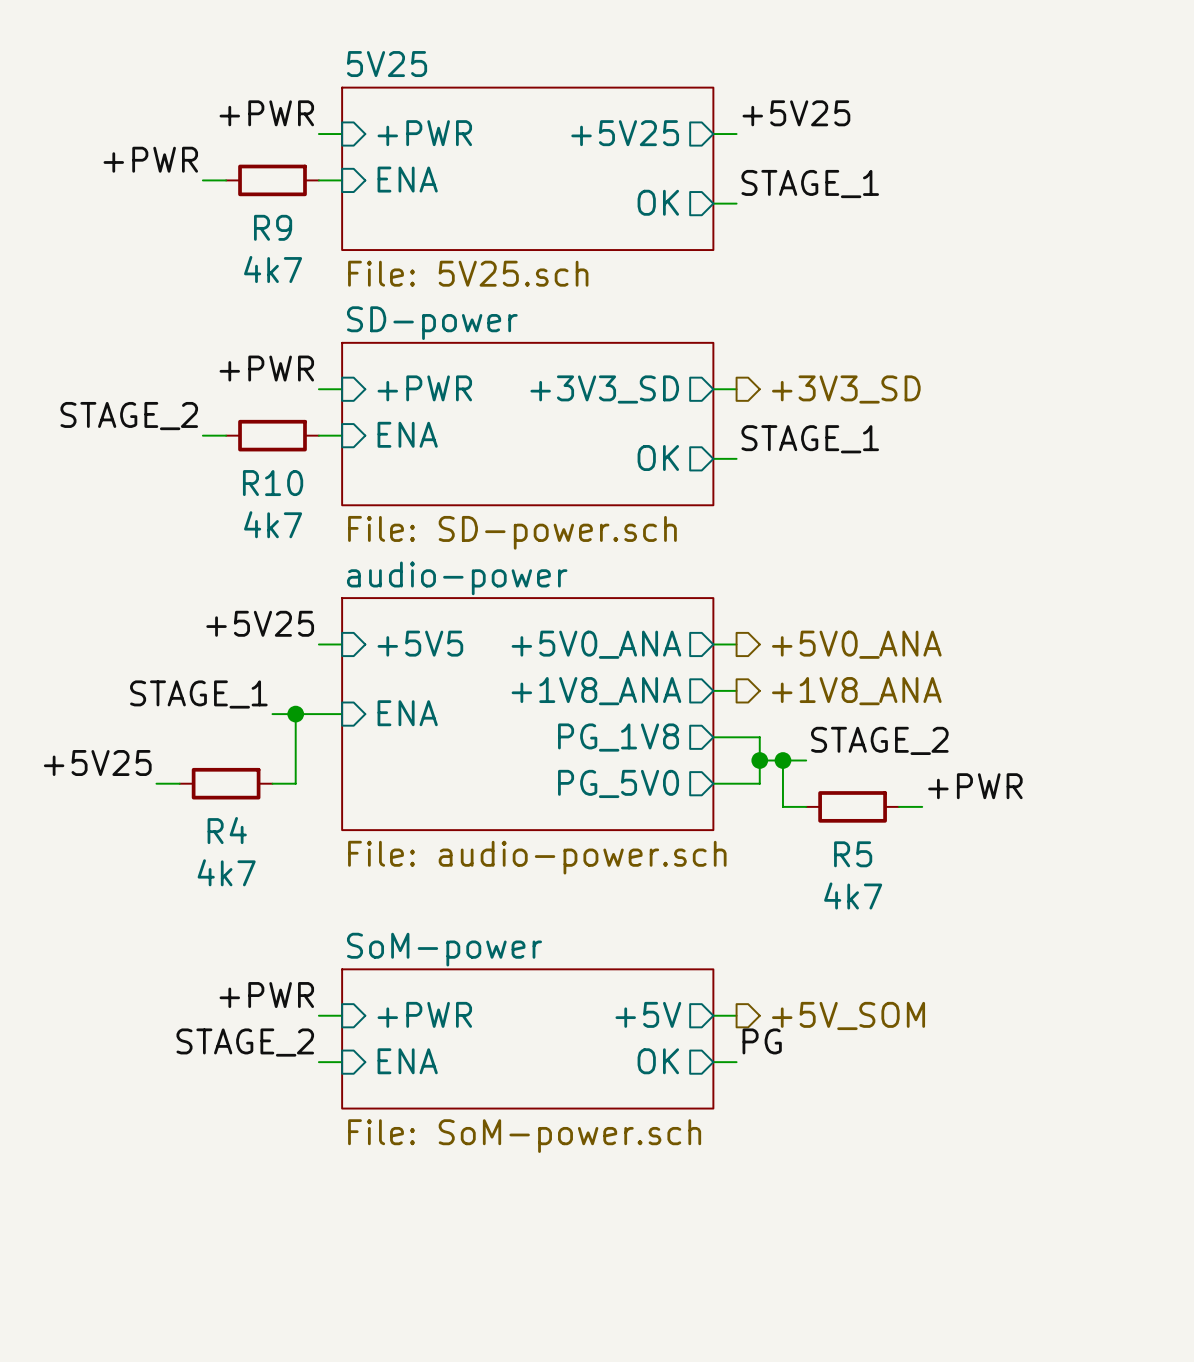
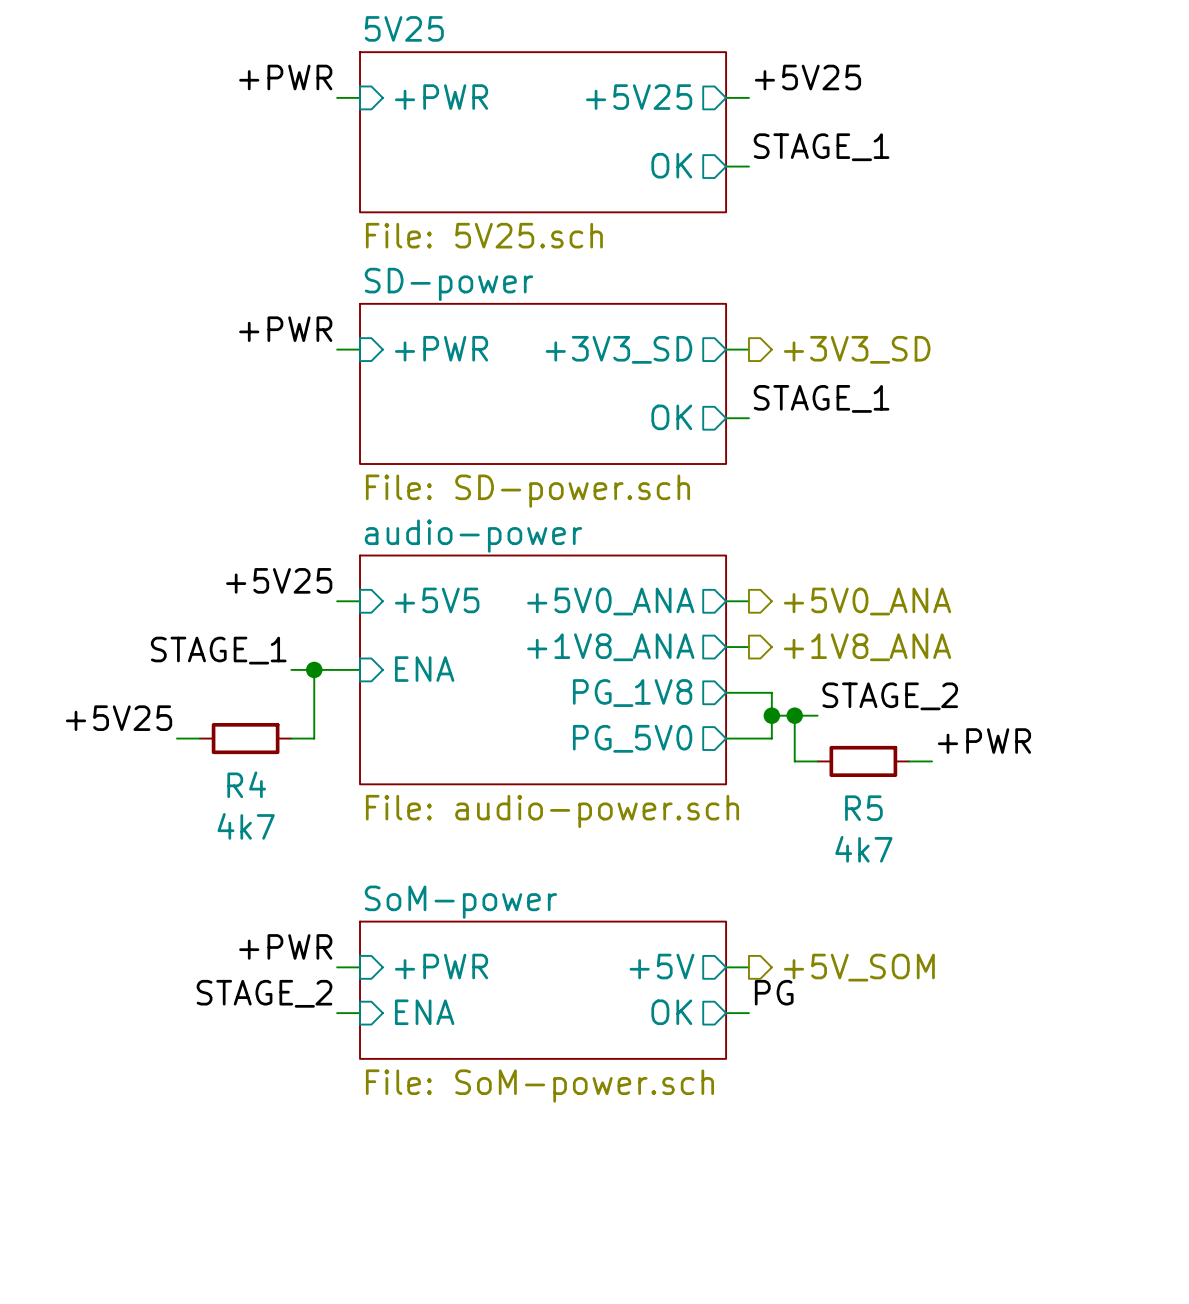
label: +PWR (150, 159) -> none
sheet pin: ENA (407, 179) -> none
wire: (202, 180) (226, 180) -> none
R9: 4k7 (272, 180) -> none
wire: (318, 180) (342, 180) -> none
label: STAGE_2 (129, 416) -> none
sheet pin: ENA (407, 434) -> none
wire: (202, 435) (226, 435) -> none
R10: 4k7 (272, 435) -> none
wire: (318, 435) (342, 435) -> none

